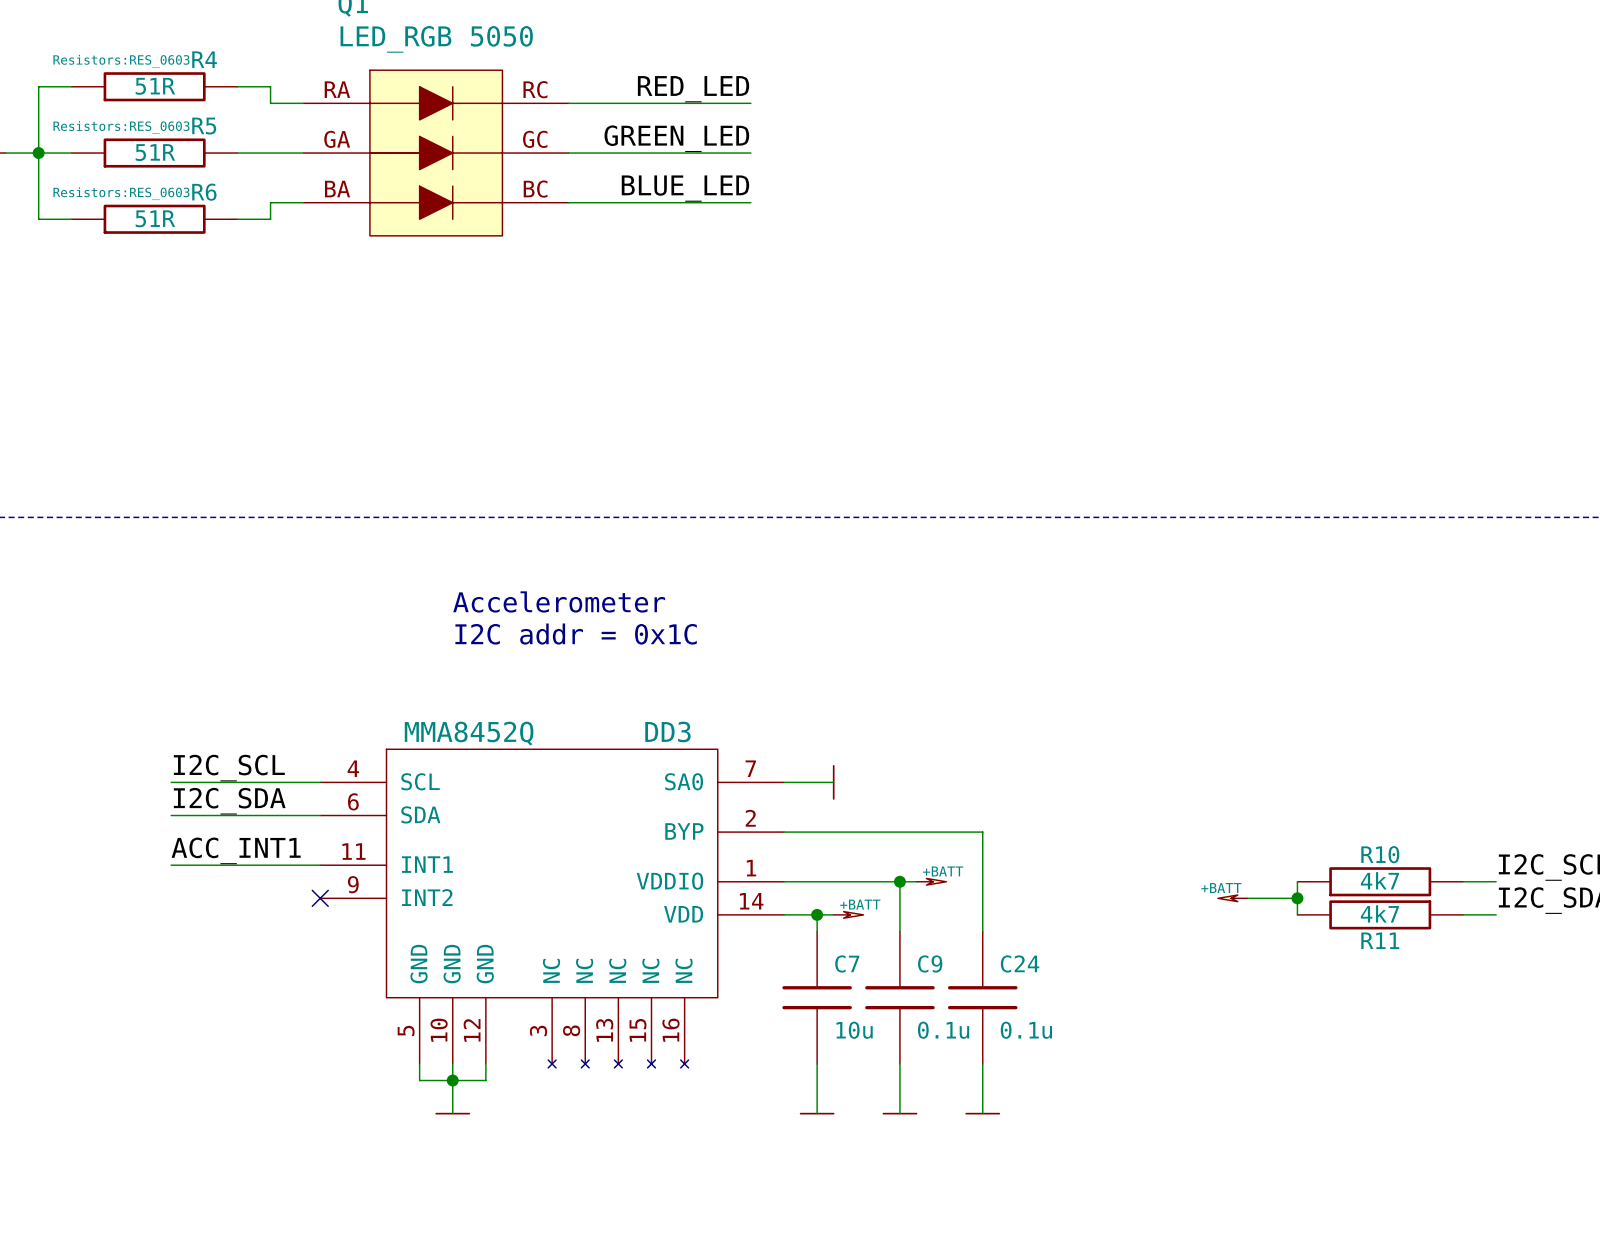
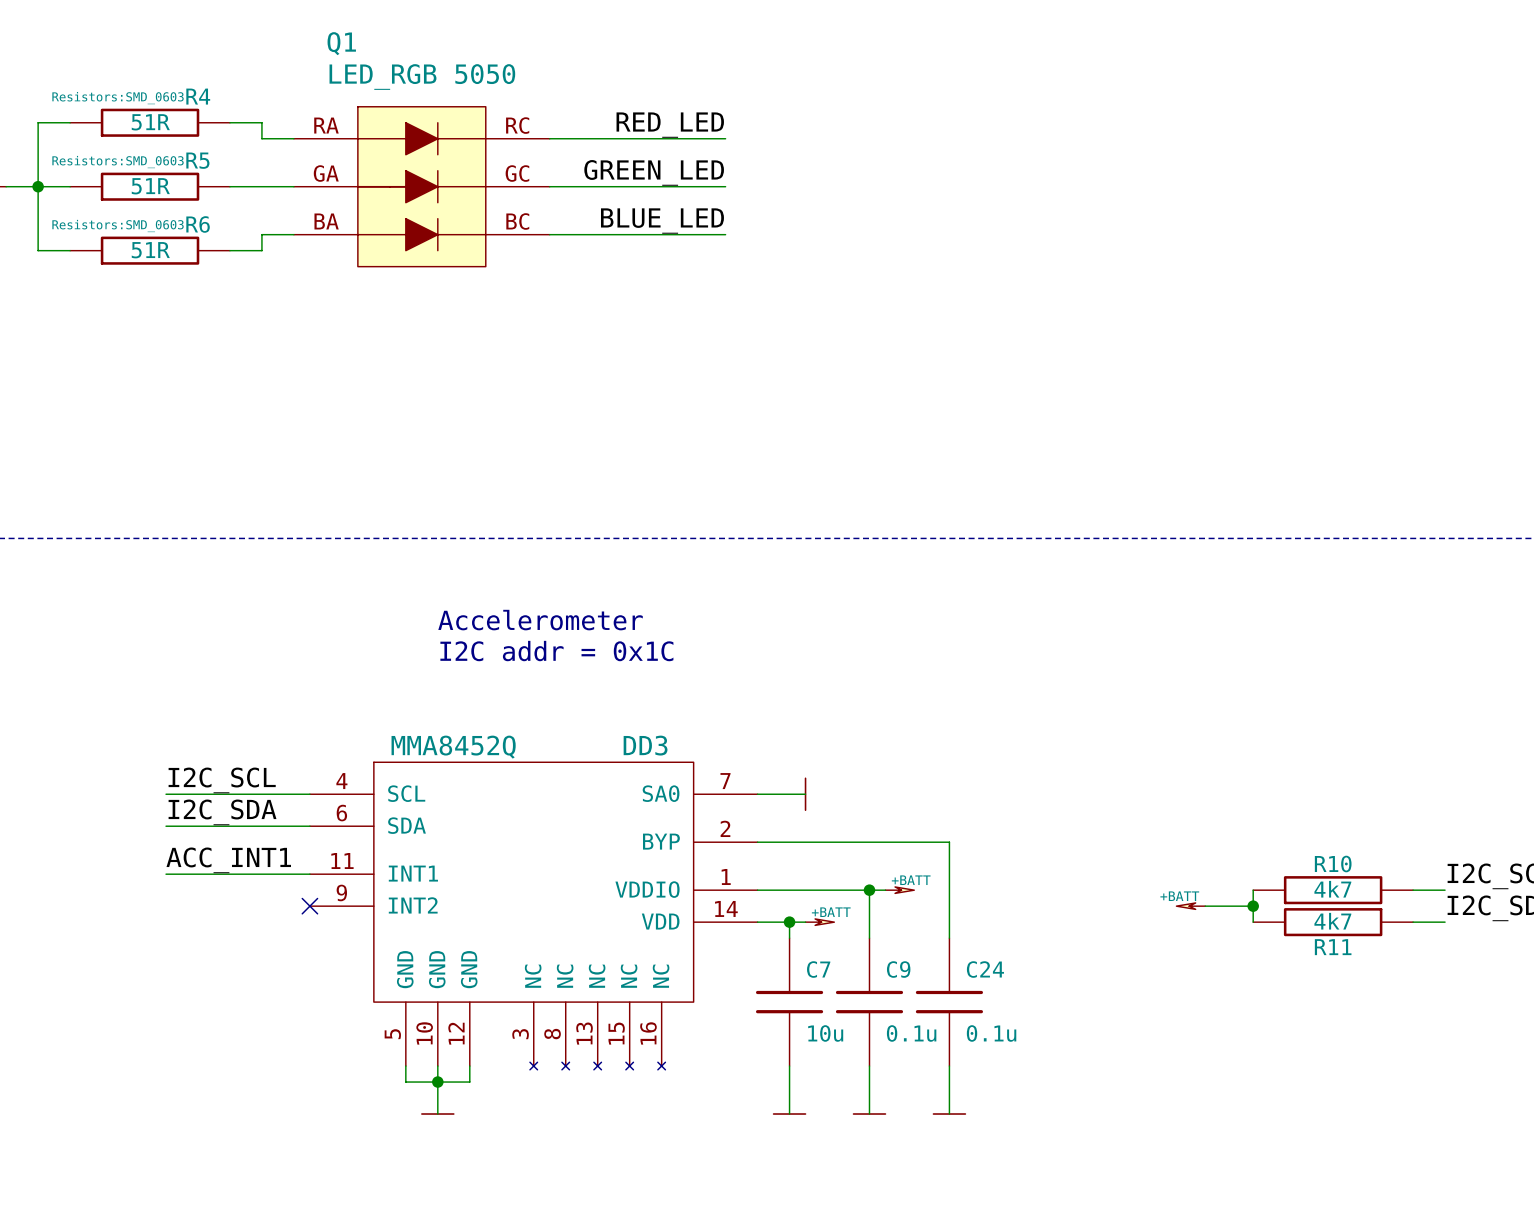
R4 text: Resistors:RES_0603 (121, 61) -> Resistors:SMD_0603 (118, 98)
R5 text: Resistors:RES_0603 (121, 127) -> Resistors:SMD_0603 (118, 162)
R6 text: Resistors:RES_0603 (121, 193) -> Resistors:SMD_0603 (118, 226)

